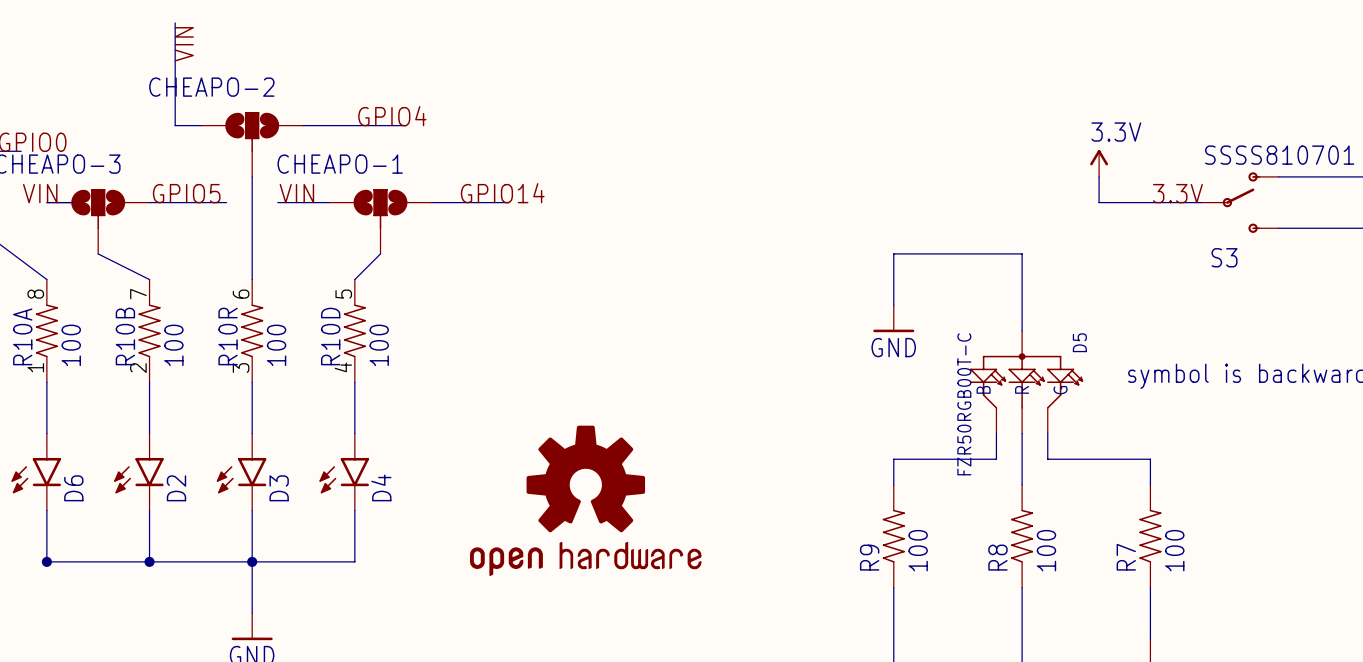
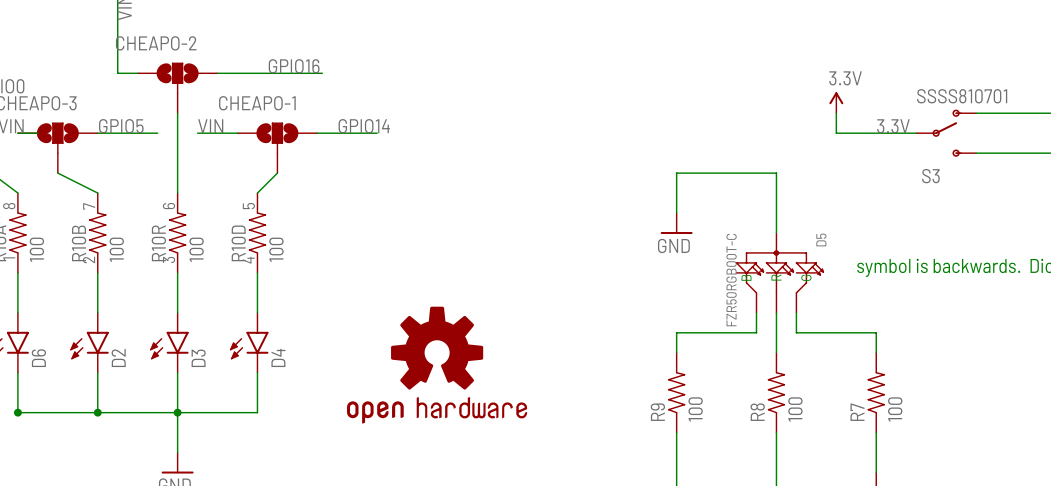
label: GPIO4 (392, 116) -> GPIO16 (294, 66)
wire: none -> (297, 73) (322, 73)

